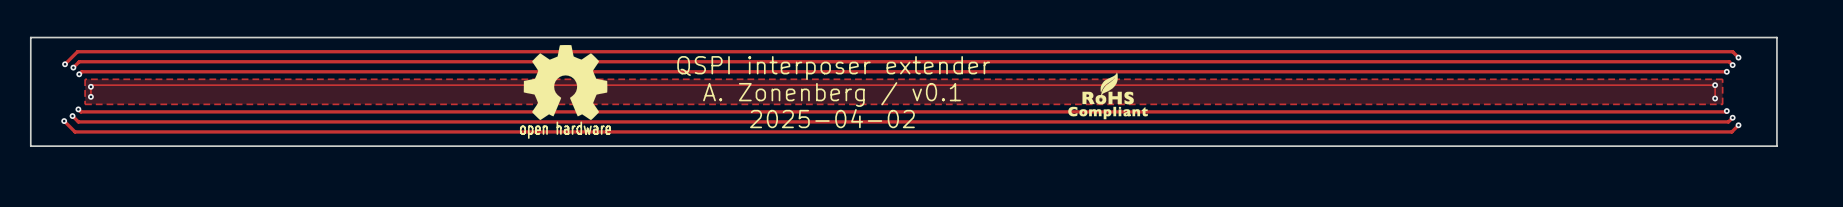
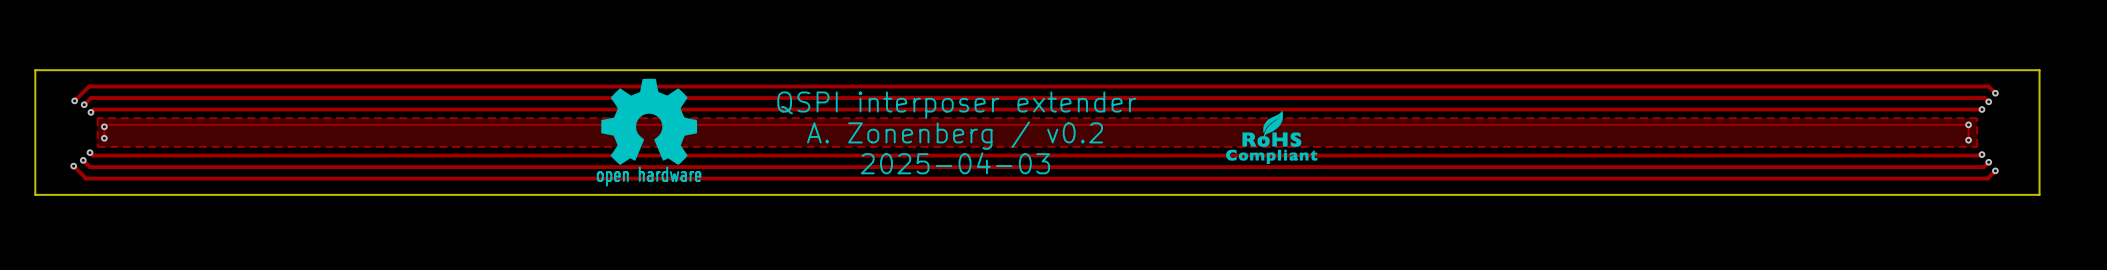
text: A. Zonenberg / v0.1 (832, 94) -> A. Zonenberg / v0.2 (955, 135)
text: 2025-04-02 (832, 118) -> 2025-04-03 (955, 163)

